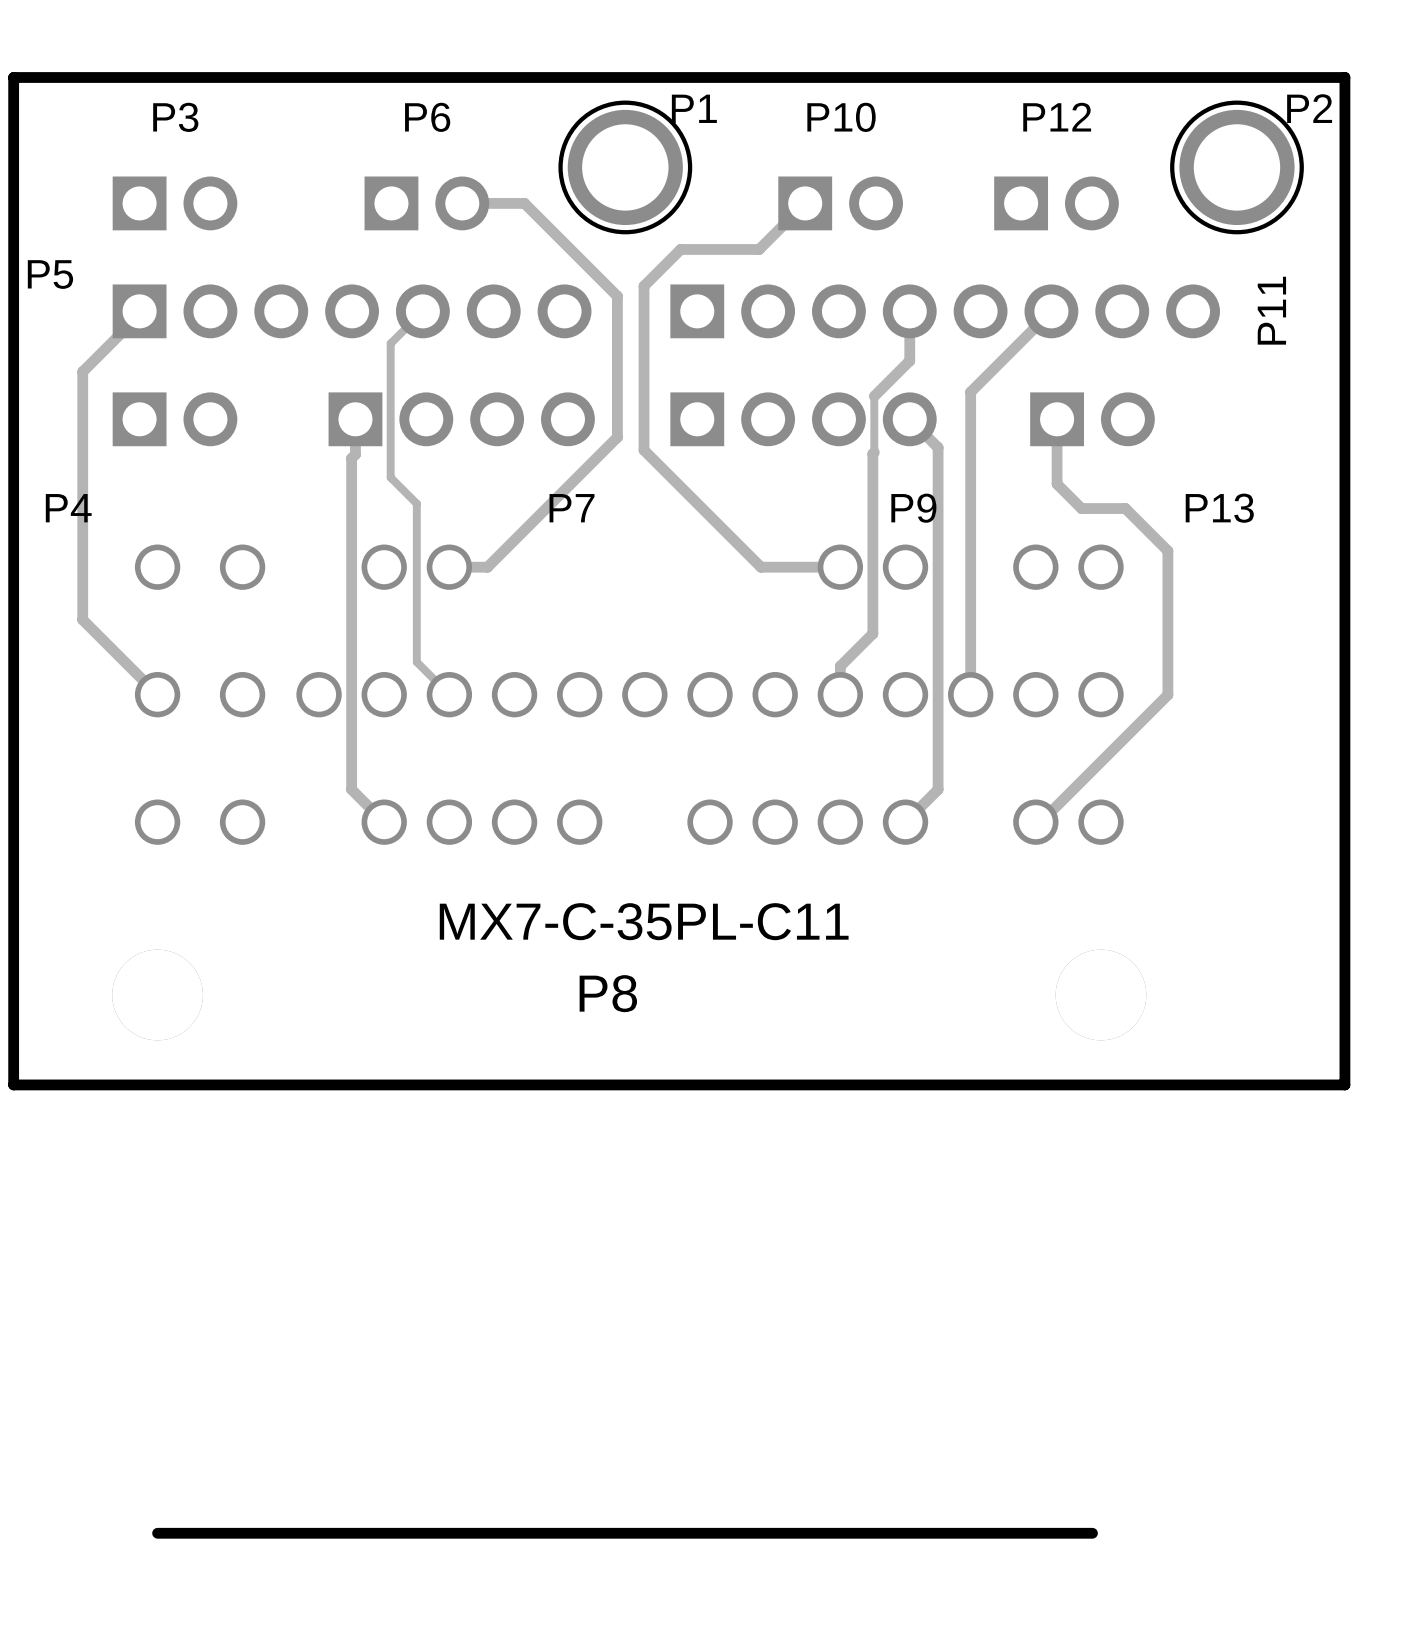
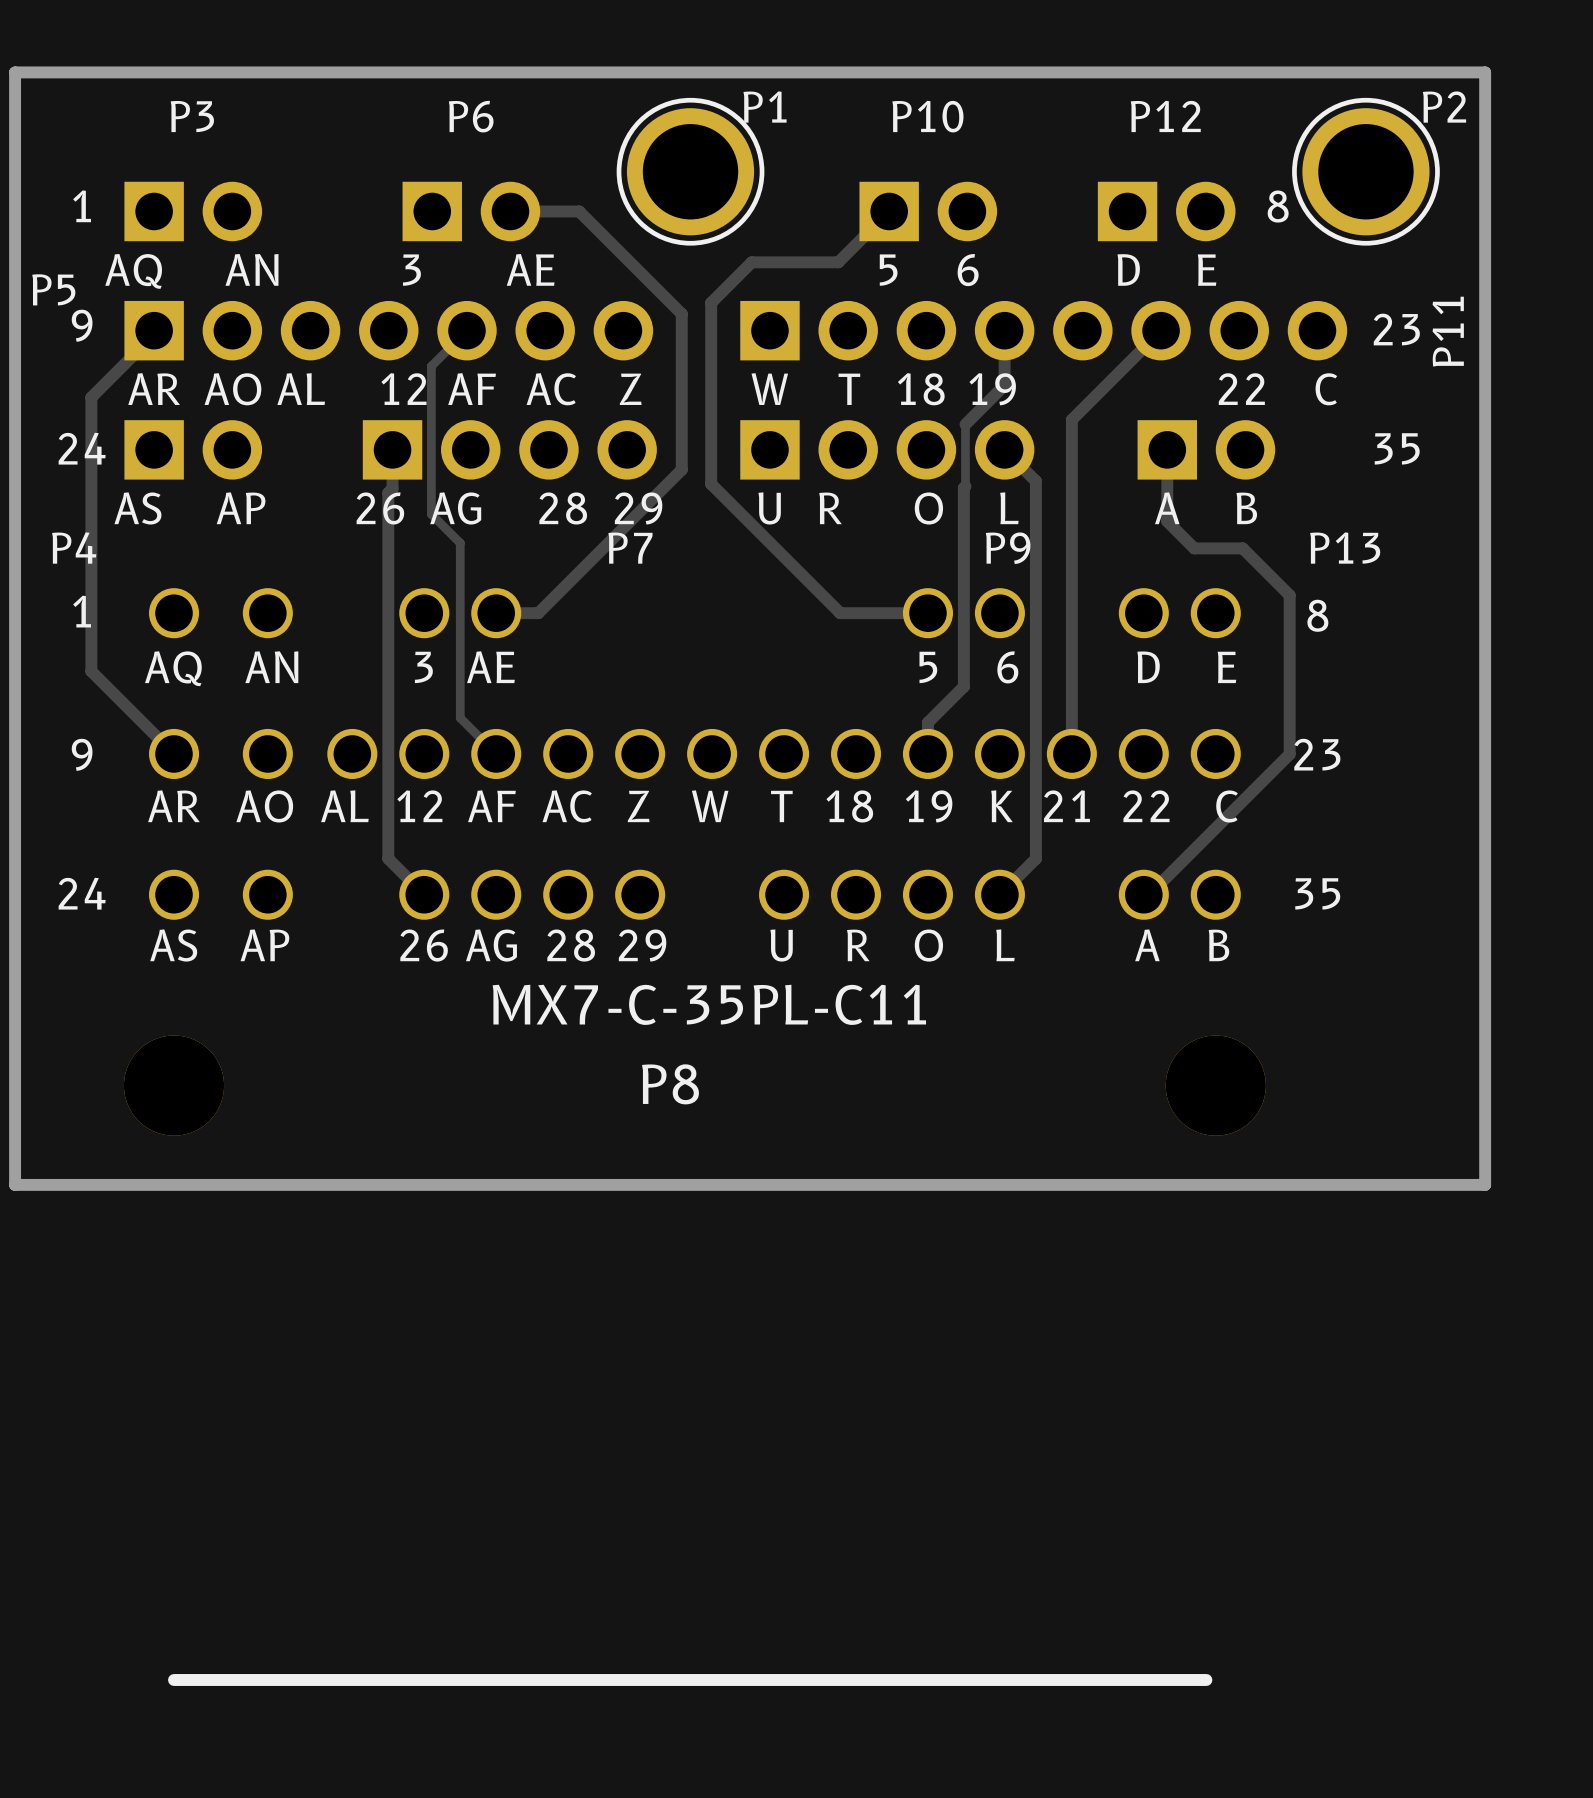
text: none -> 1 (82, 206)
text: none -> 8 (1278, 206)
text: none -> AN (251, 269)
text: none -> 3 (411, 270)
text: none -> AE (530, 269)
text: none -> 5 (888, 270)
text: none -> 6 (968, 270)
text: none -> D (1128, 269)
text: none -> E (1207, 270)
text: none -> AQ (133, 271)
text: none -> 9 (82, 325)
text: none -> 23 (1396, 329)
P11 name position: P11 (1271, 310) -> P11 (1448, 331)
text: none -> AR (154, 389)
text: none -> AO (232, 389)
text: none -> AL (301, 389)
text: none -> 12 (403, 389)
text: none -> AF (472, 389)
text: none -> AC (551, 389)
text: none -> Z (630, 389)
text: none -> W (769, 389)
text: none -> T (849, 389)
text: none -> 18 (921, 389)
text: none -> 19 (992, 389)
text: none -> 22 (1241, 389)
text: none -> C (1326, 389)
text: none -> 24 (82, 448)
text: none -> 35 (1397, 448)
text: none -> AS (137, 508)
text: none -> AP (241, 508)
text: none -> 26 (380, 508)
text: none -> AG (455, 508)
text: none -> 28 (563, 508)
text: none -> 29 (638, 508)
text: none -> U (769, 508)
text: none -> R (830, 508)
text: none -> O (928, 508)
text: none -> L (1009, 508)
text: none -> A (1167, 508)
text: none -> B (1246, 508)
text: none -> 1 (82, 611)
text: none -> 8 (1317, 615)
text: none -> AN (271, 667)
text: none -> 3 (423, 667)
text: none -> AE (490, 667)
text: none -> 5 (928, 667)
text: none -> 6 (1007, 667)
text: none -> D (1148, 667)
text: none -> E (1226, 667)
text: none -> AQ (173, 668)
text: none -> 9 (82, 754)
text: none -> 23 (1317, 754)
text: none -> 12 (419, 806)
text: none -> 21 (1066, 806)
text: none -> 22 (1146, 806)
text: none -> AR (173, 806)
text: none -> AO (264, 806)
text: none -> AL (344, 806)
text: none -> AF (491, 806)
text: none -> AC (567, 806)
text: none -> Z (638, 806)
text: none -> W (710, 806)
text: none -> T (781, 806)
text: none -> 18 (849, 806)
text: none -> 19 (929, 806)
text: none -> K (1001, 806)
text: none -> C (1227, 806)
text: none -> 24 (82, 893)
text: none -> 35 (1317, 893)
text: none -> AS (173, 945)
text: none -> AP (264, 945)
text: none -> 26 (424, 945)
text: none -> AG (491, 945)
text: none -> 28 (571, 945)
text: none -> 29 (642, 945)
text: none -> R (858, 945)
text: none -> O (928, 945)
text: none -> L (1005, 945)
text: none -> A (1147, 945)
text: none -> B (1218, 945)
text: none -> U (781, 945)

